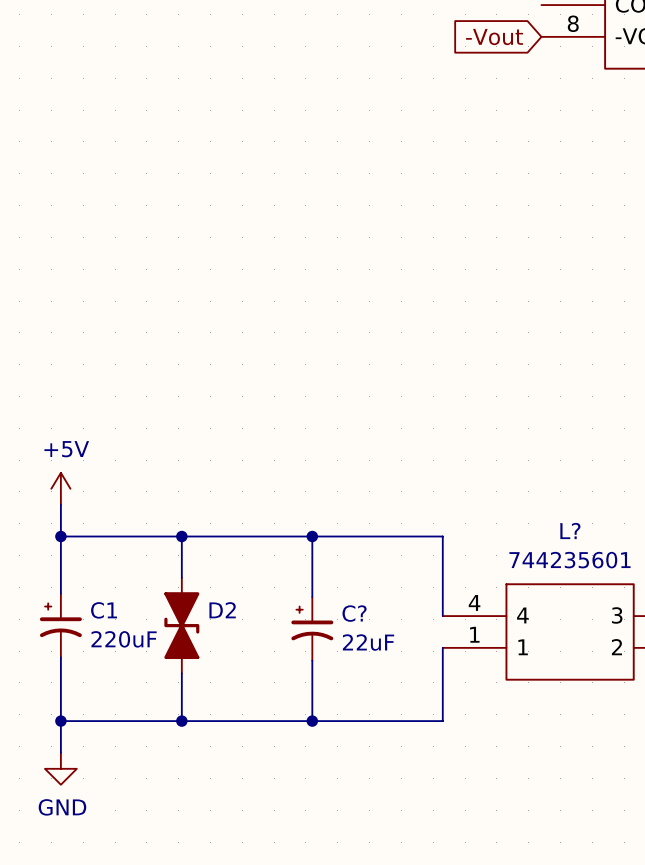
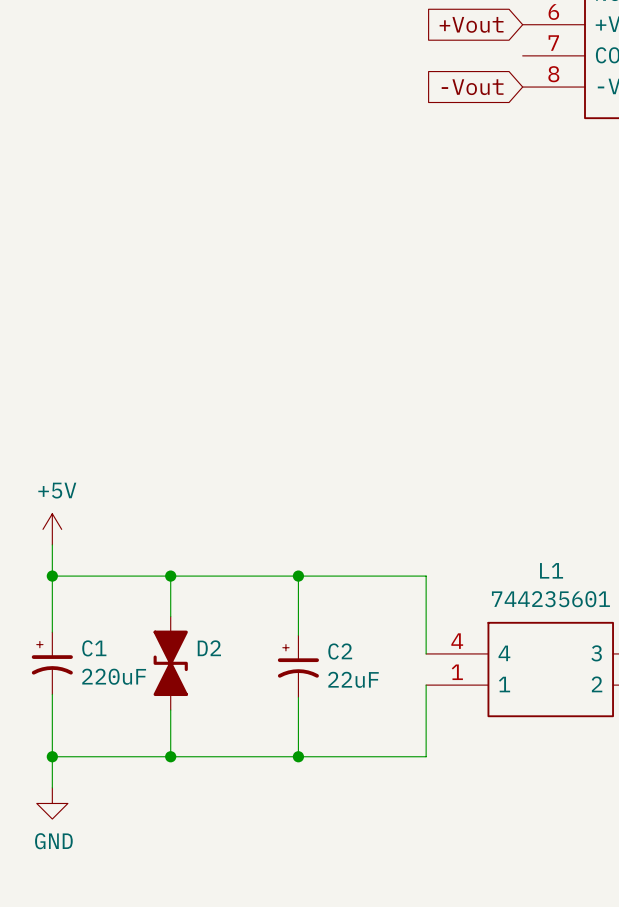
L? name: L? (570, 530) -> L1 (551, 570)
C? name: C? (354, 613) -> C2 (340, 651)

